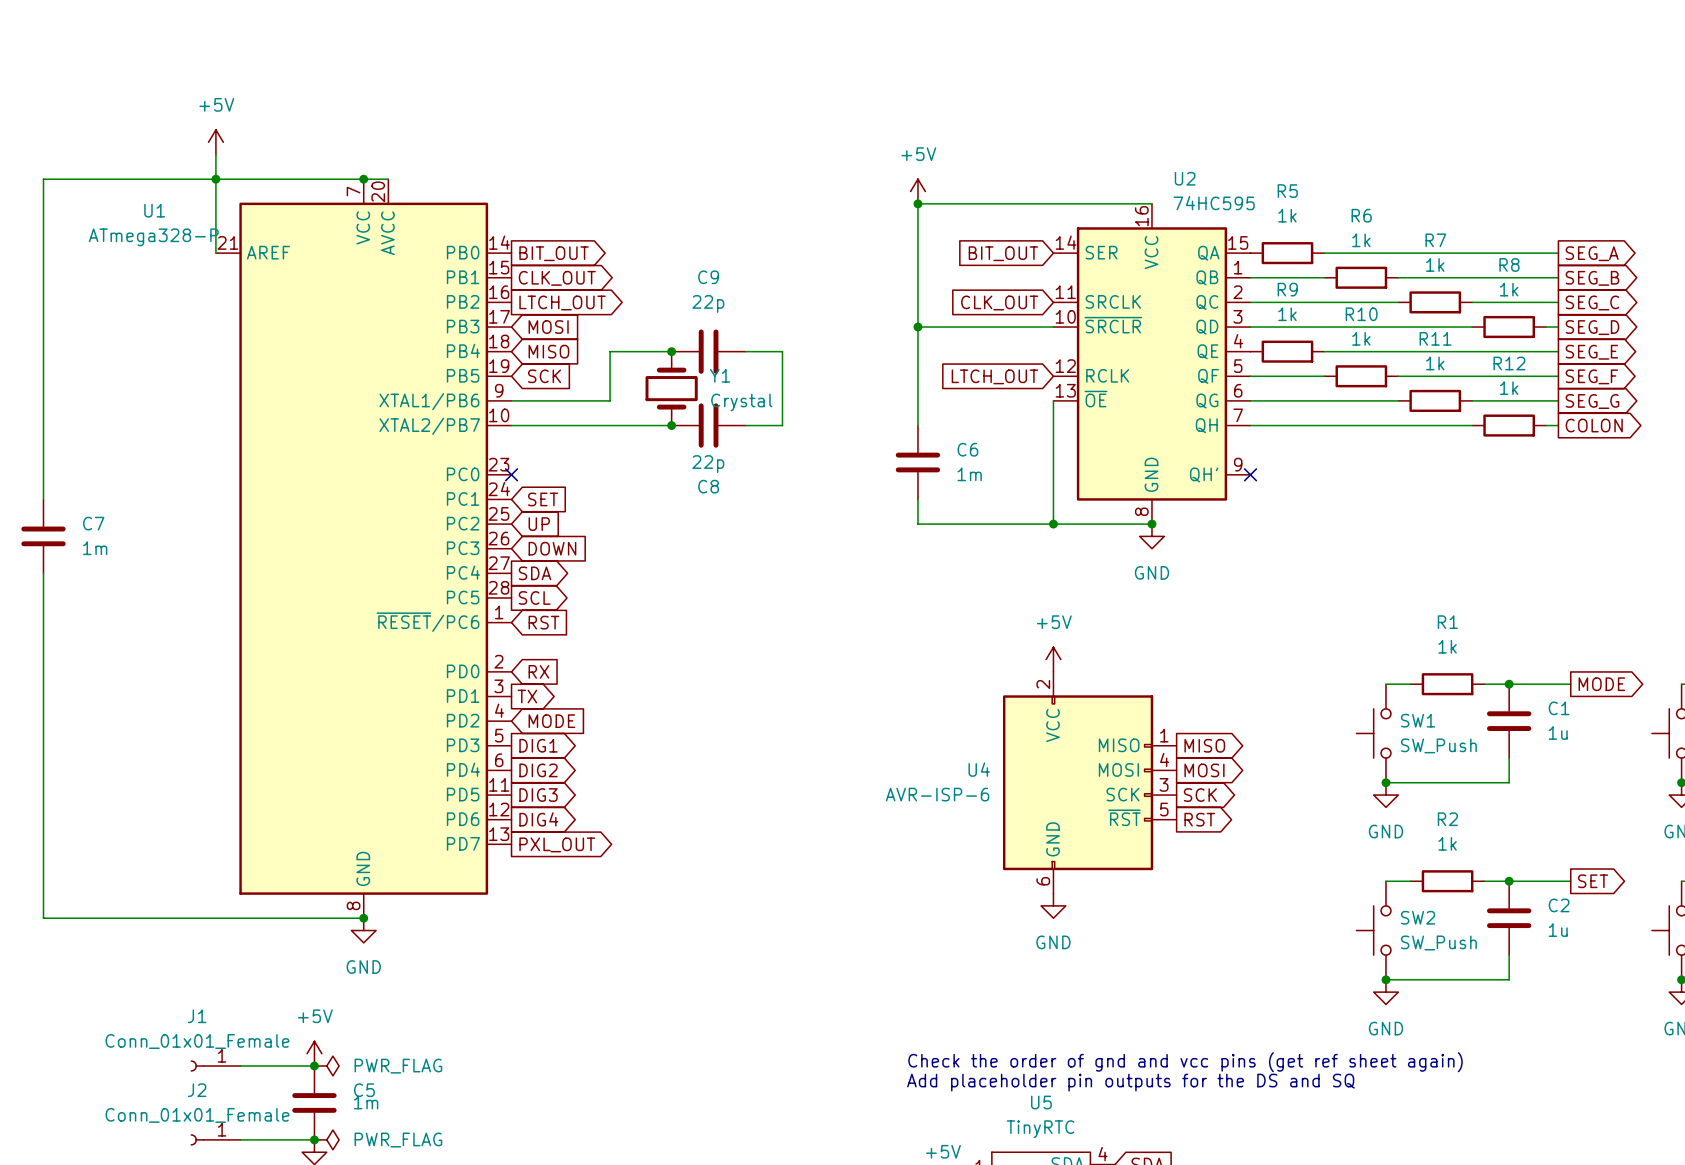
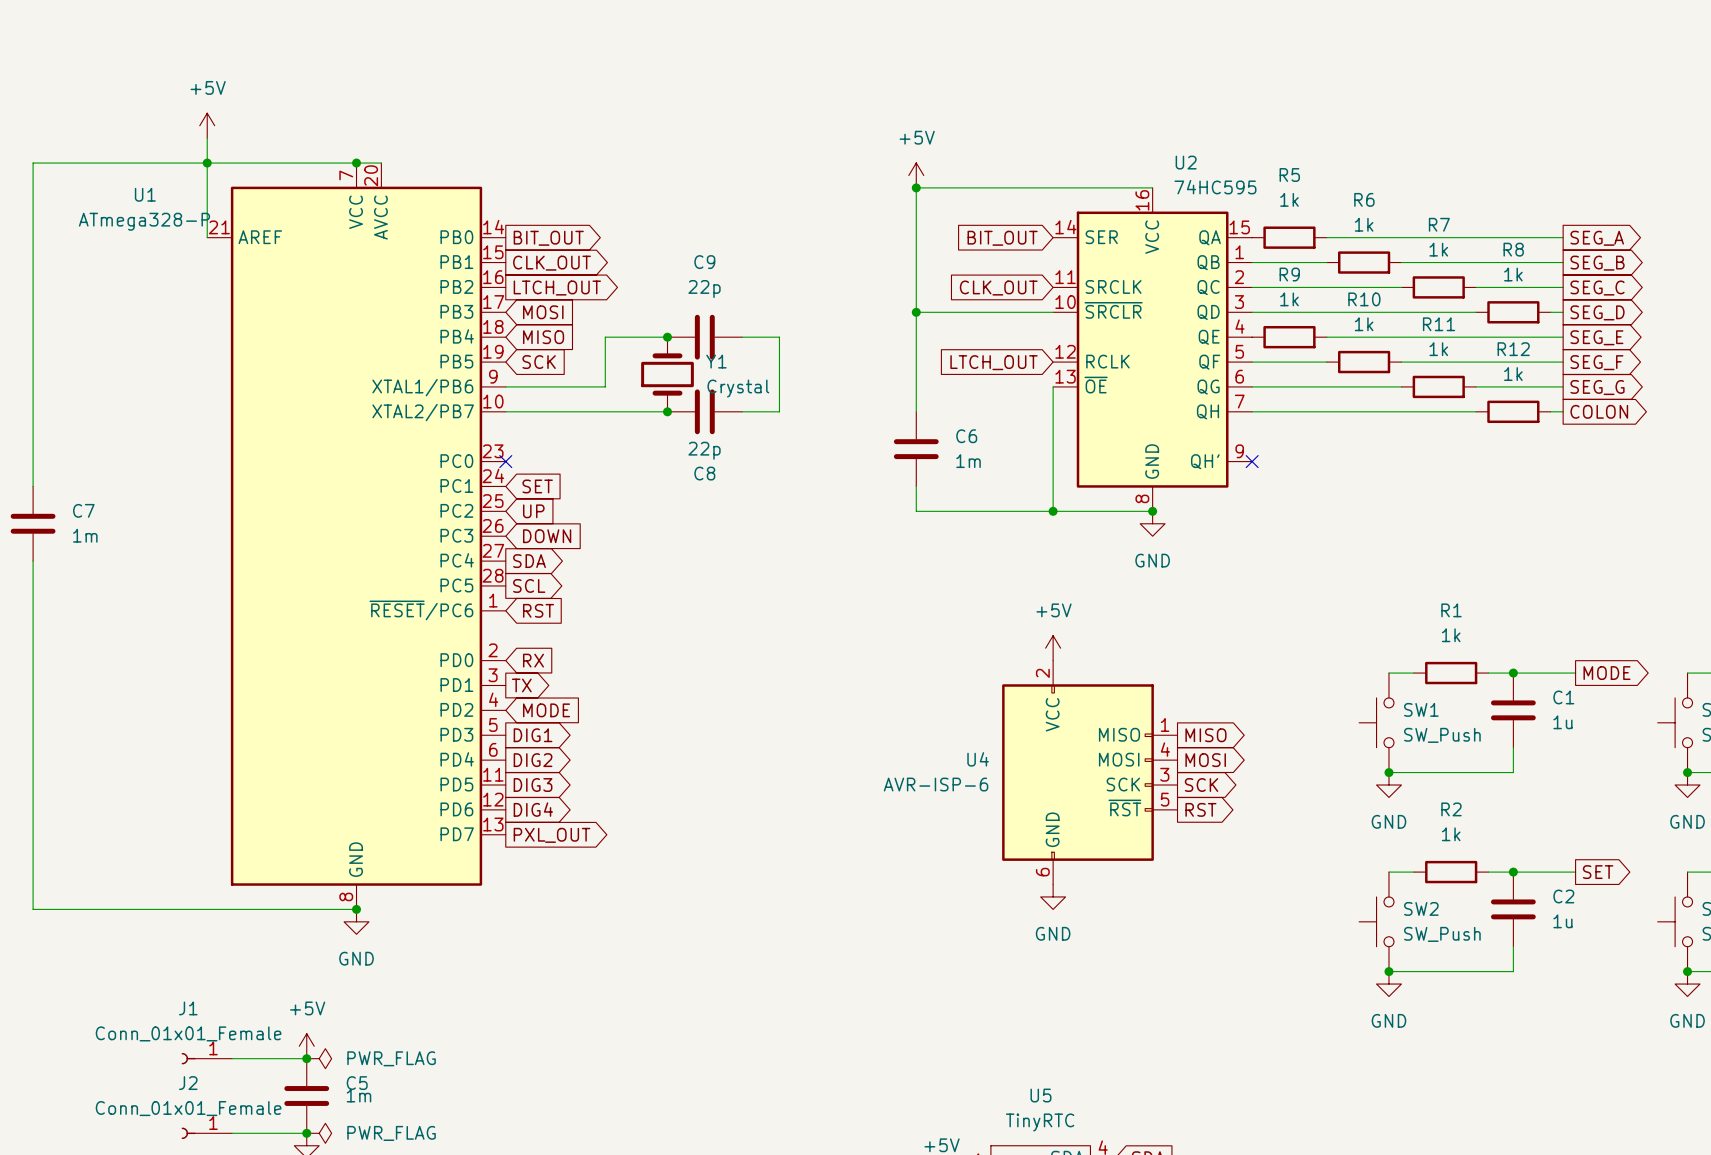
text: Check the order of gnd and vcc pins (get ref sheet again) (1185, 1062) -> none
text: Add placeholder pin outputs for the DS and SQ (1130, 1082) -> none

